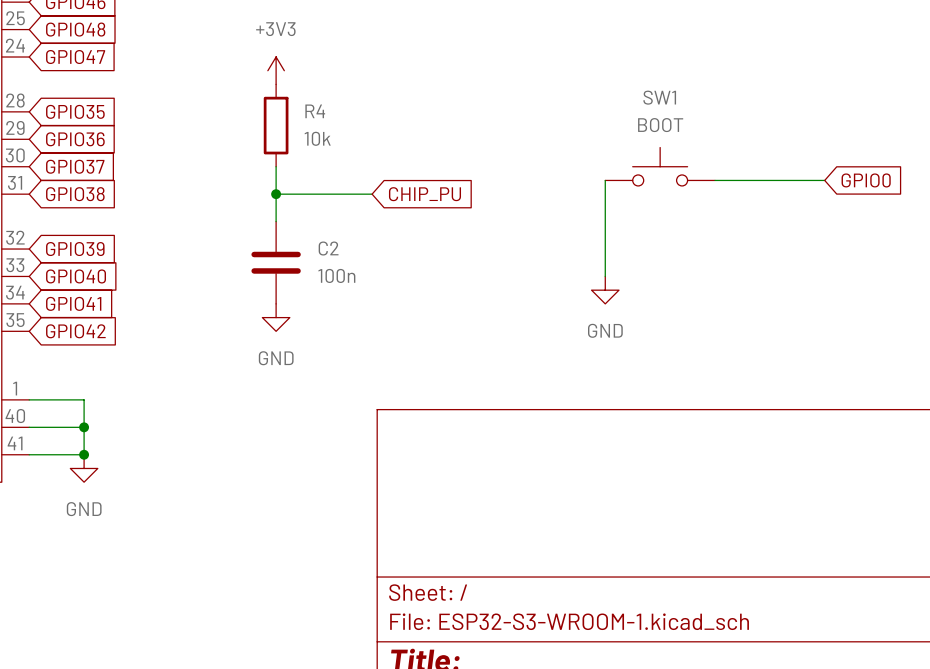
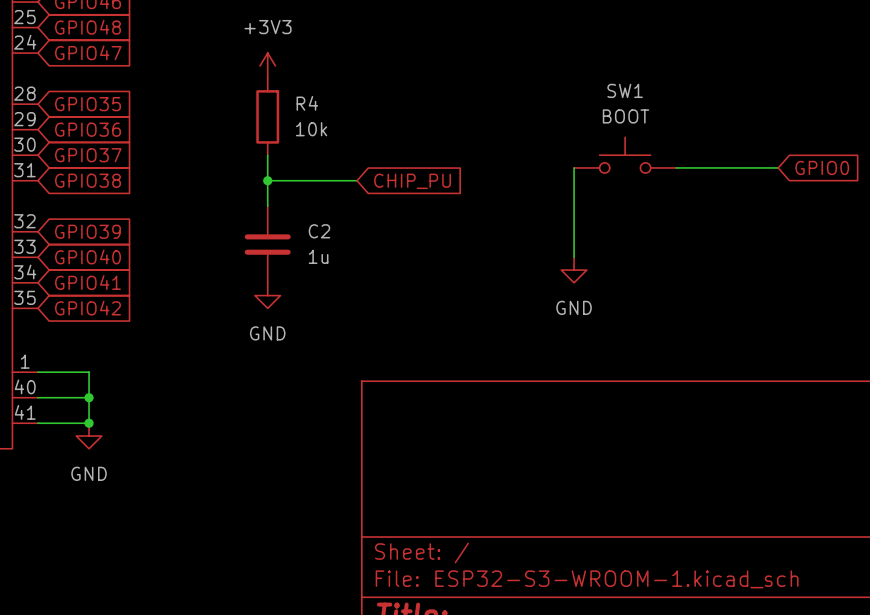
C2 value: 100n (336, 275) -> 1u (318, 256)

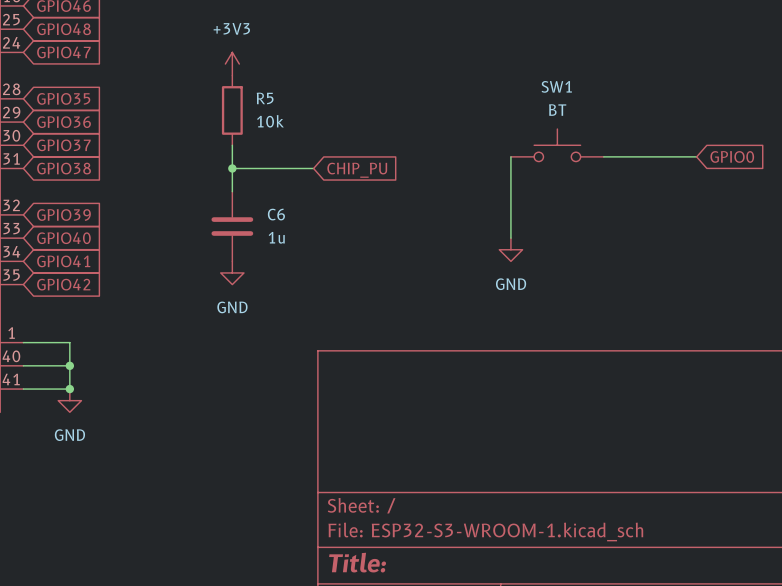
R4 name: R4 (307, 103) -> R5 (265, 98)
SW1 value: BOOT (626, 116) -> BT (557, 110)
C2 name: C2 (319, 231) -> C6 (276, 214)

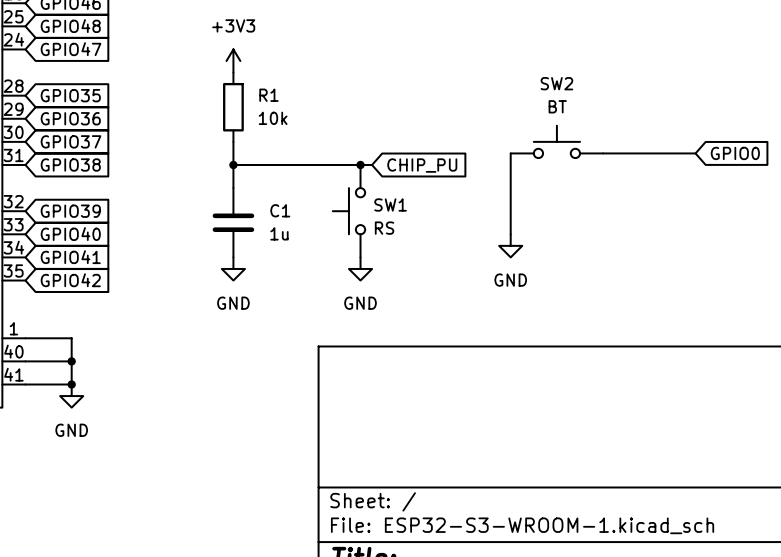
SW1 name: SW1 (556, 86) -> SW2 (556, 83)
R5 name: R5 (265, 98) -> R1 (269, 95)
wire: none -> (314, 164) (372, 164)
junction: none -> (360, 164)
global label position: CHIP_PU (357, 170) -> CHIP_PU (422, 165)
C6 name: C6 (276, 214) -> C1 (280, 210)
SW1: none -> RS (348, 211)
power symbol: none -> GND (360, 268)

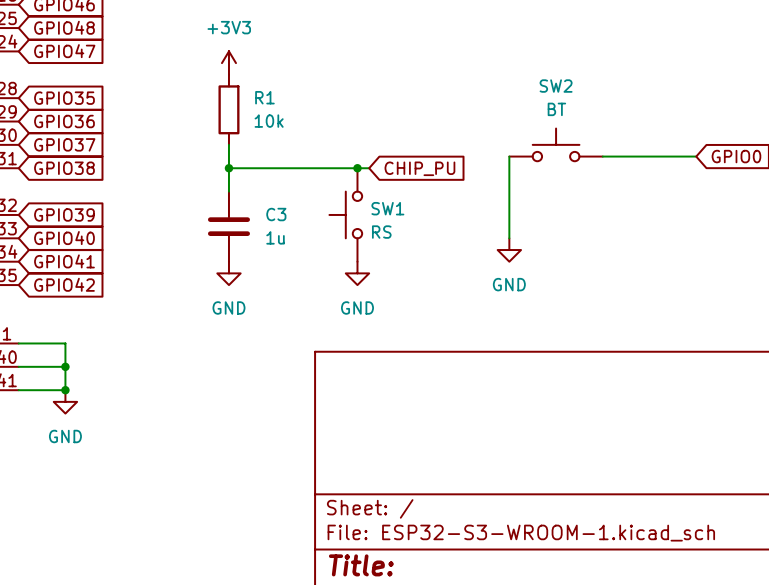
C1 name: C1 (280, 210) -> C3 (276, 214)

